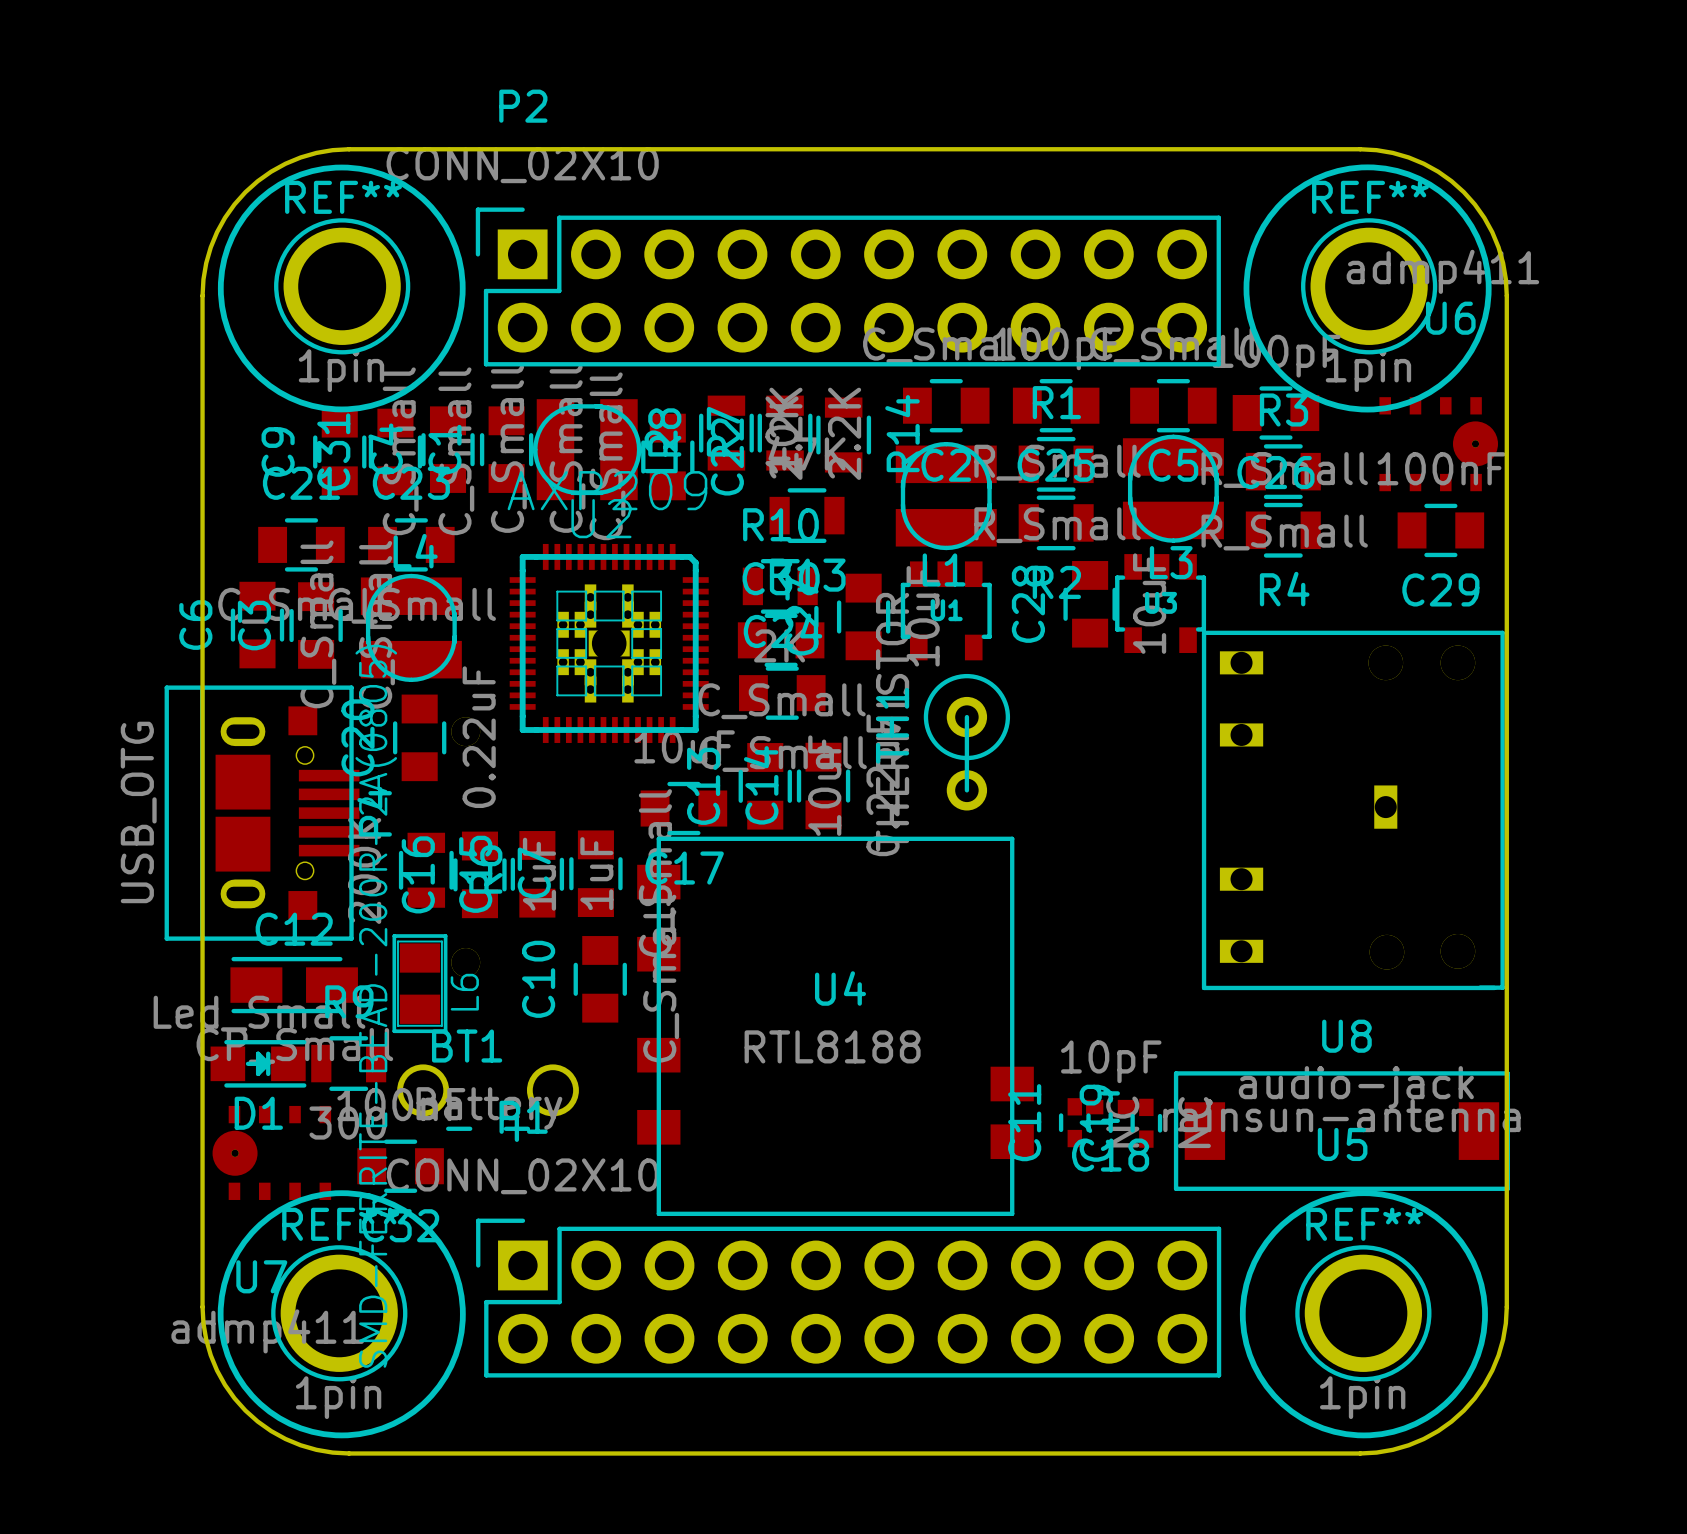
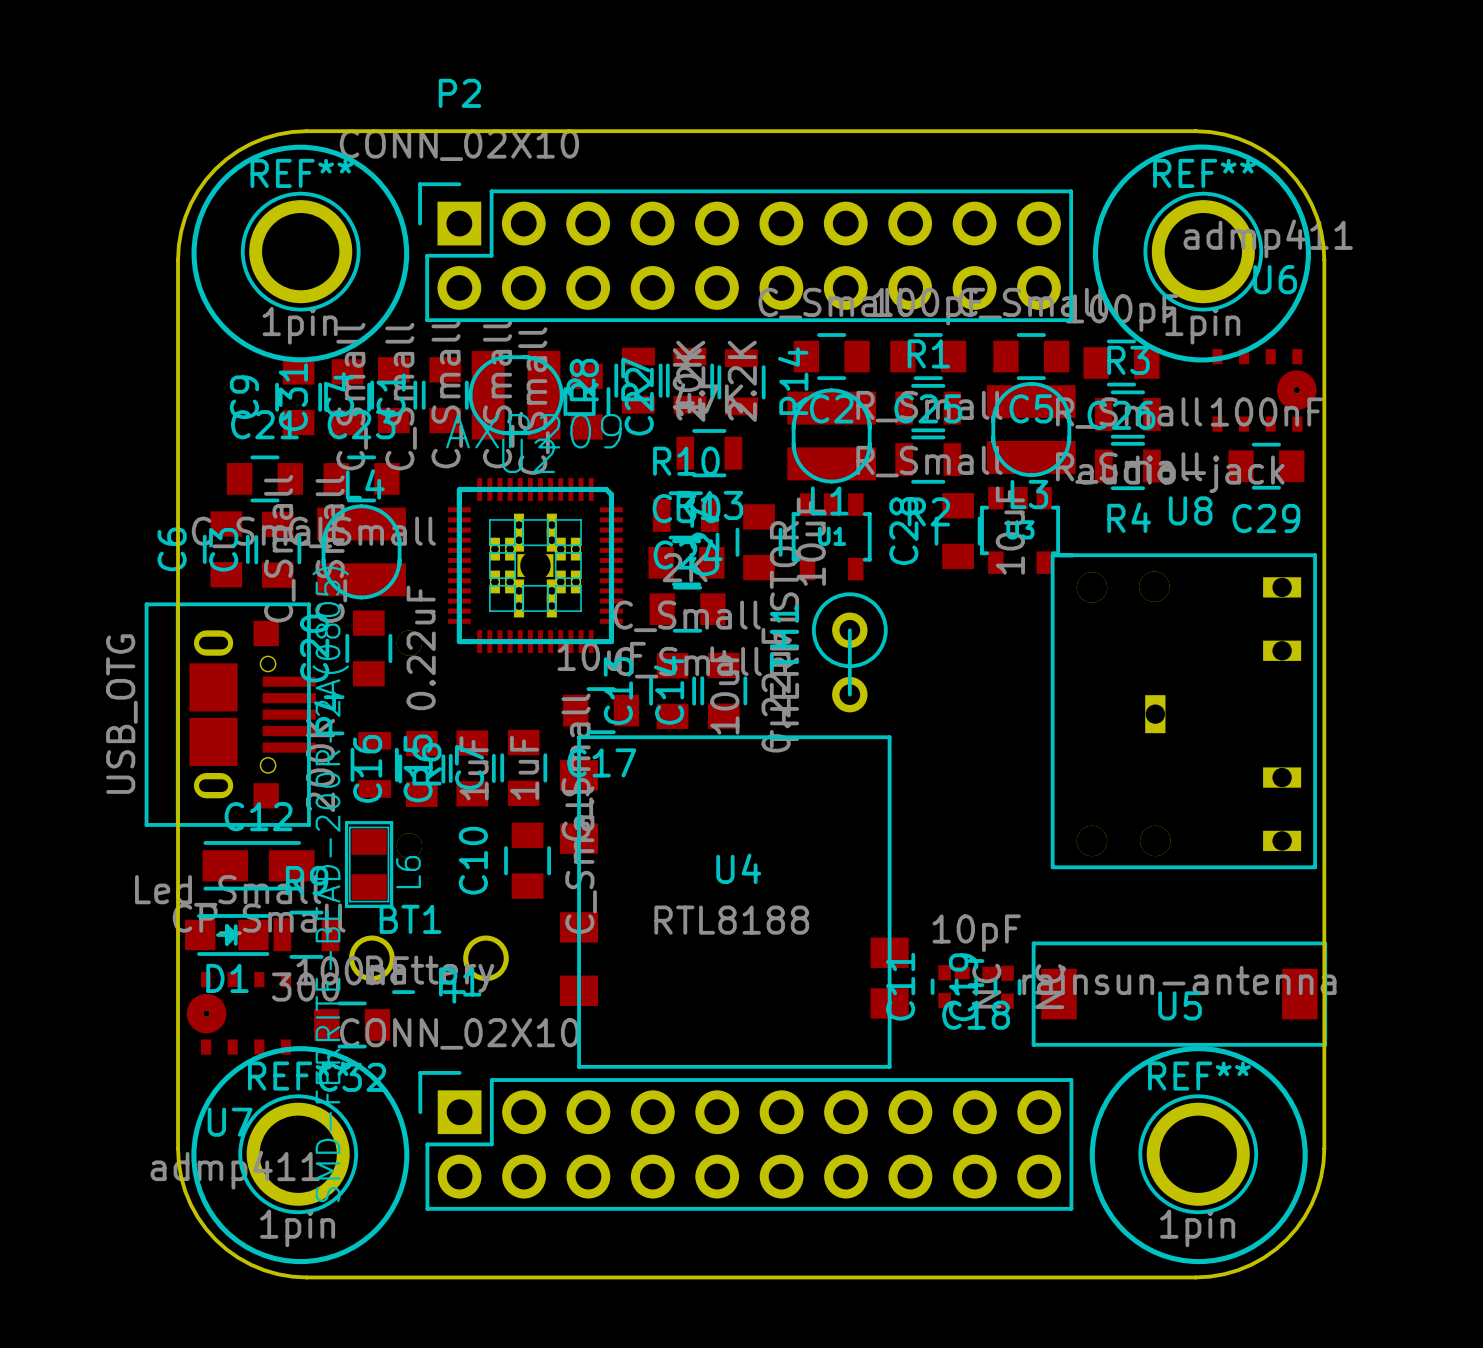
U8 rotation: 0° (1353, 810) -> 180° (1183, 711)

